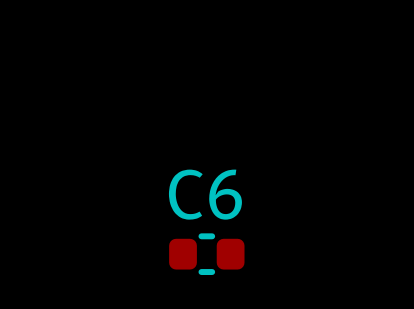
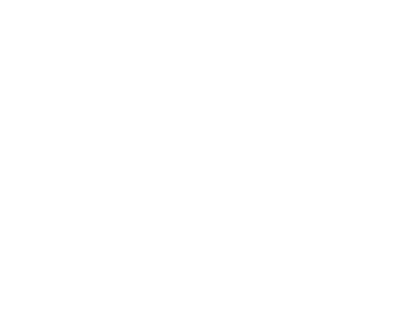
C6: (206, 254) -> none

